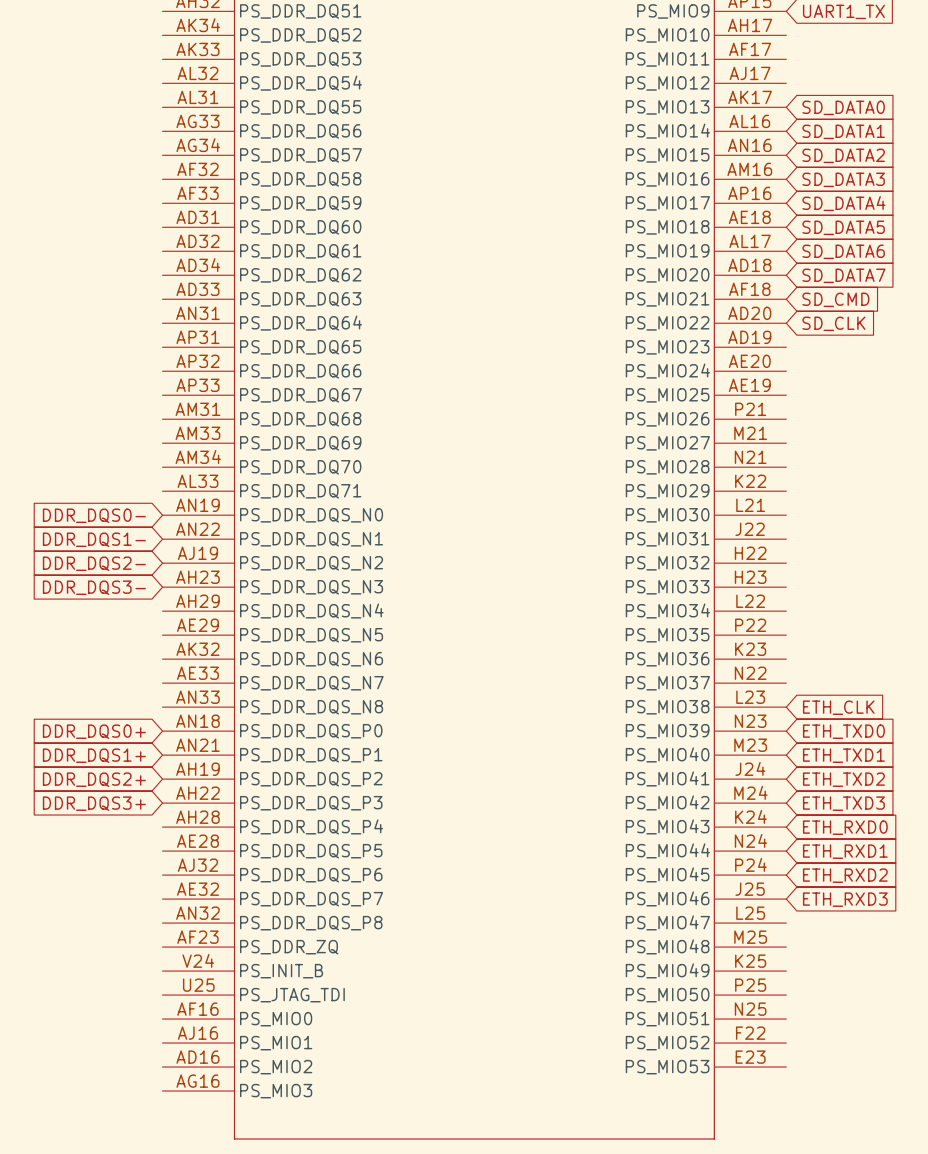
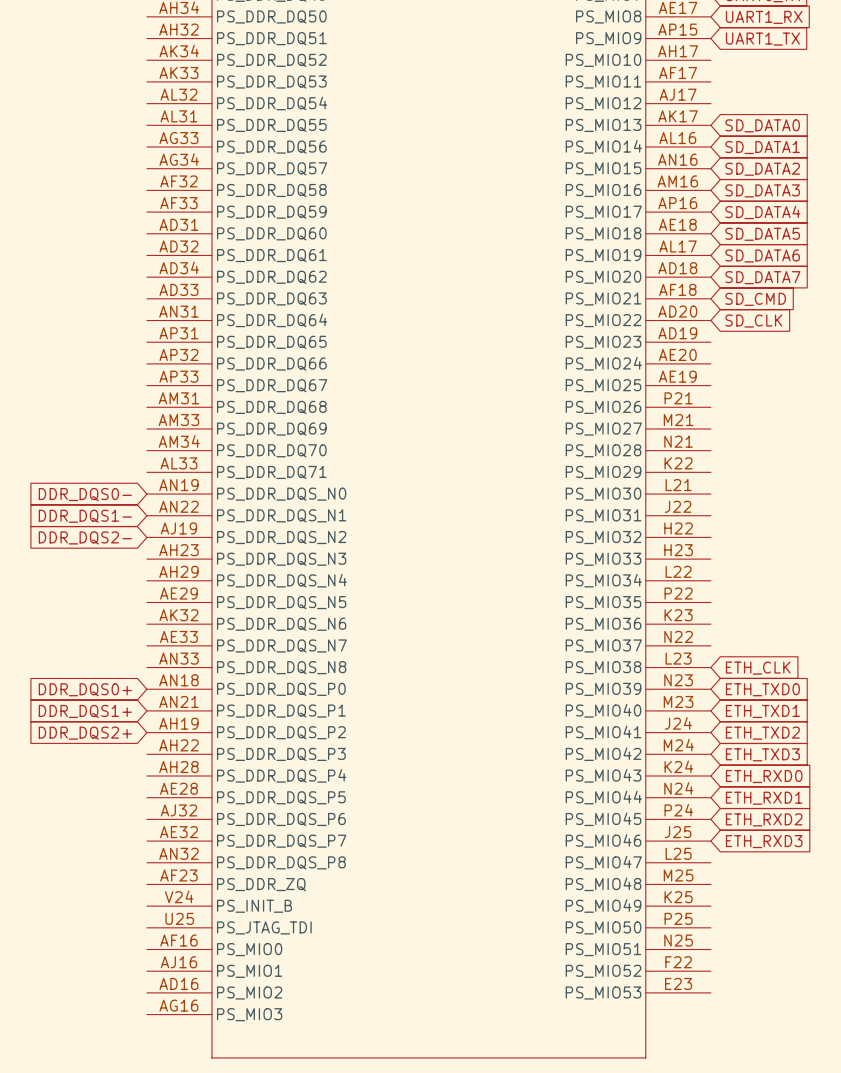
global label: DDR_DQS3- (94, 587) -> none
global label: DDR_DQS3+ (94, 803) -> none

